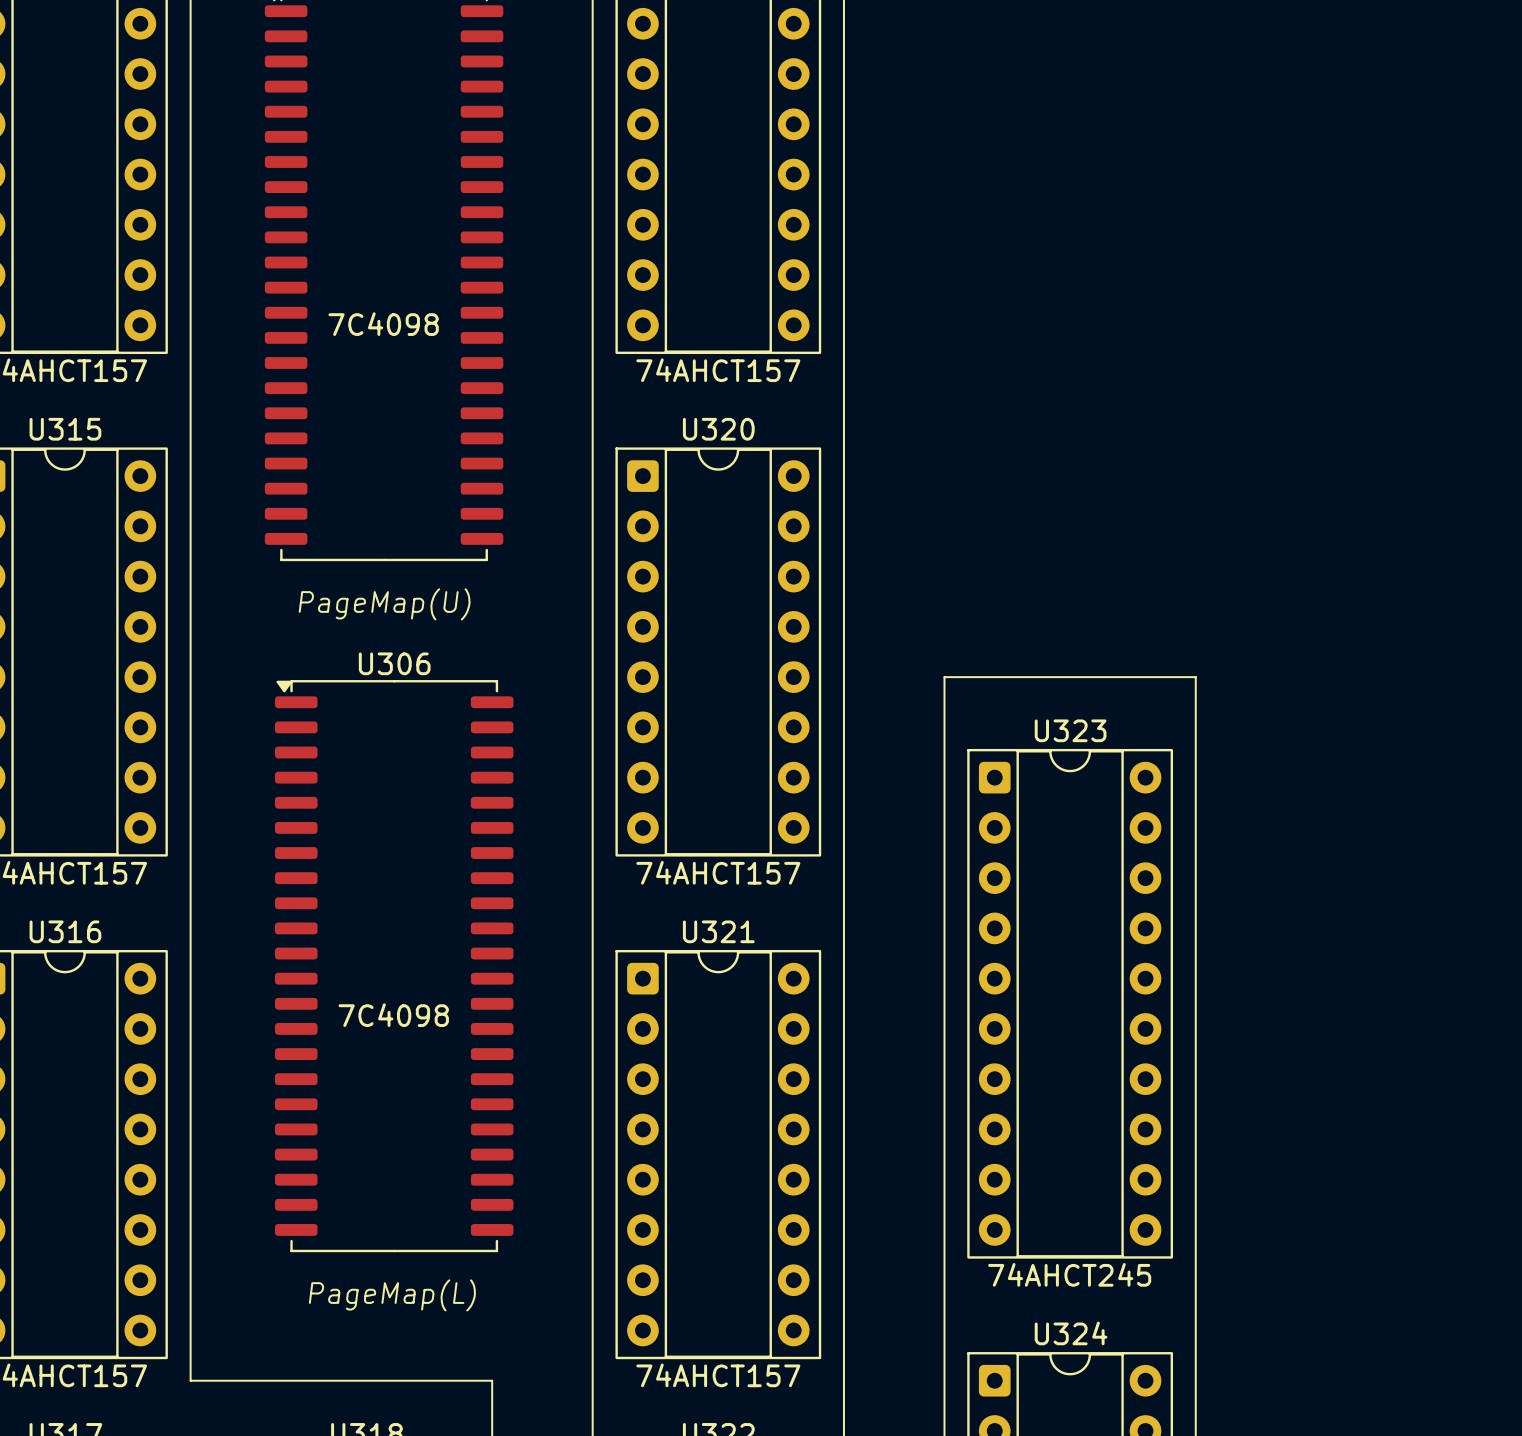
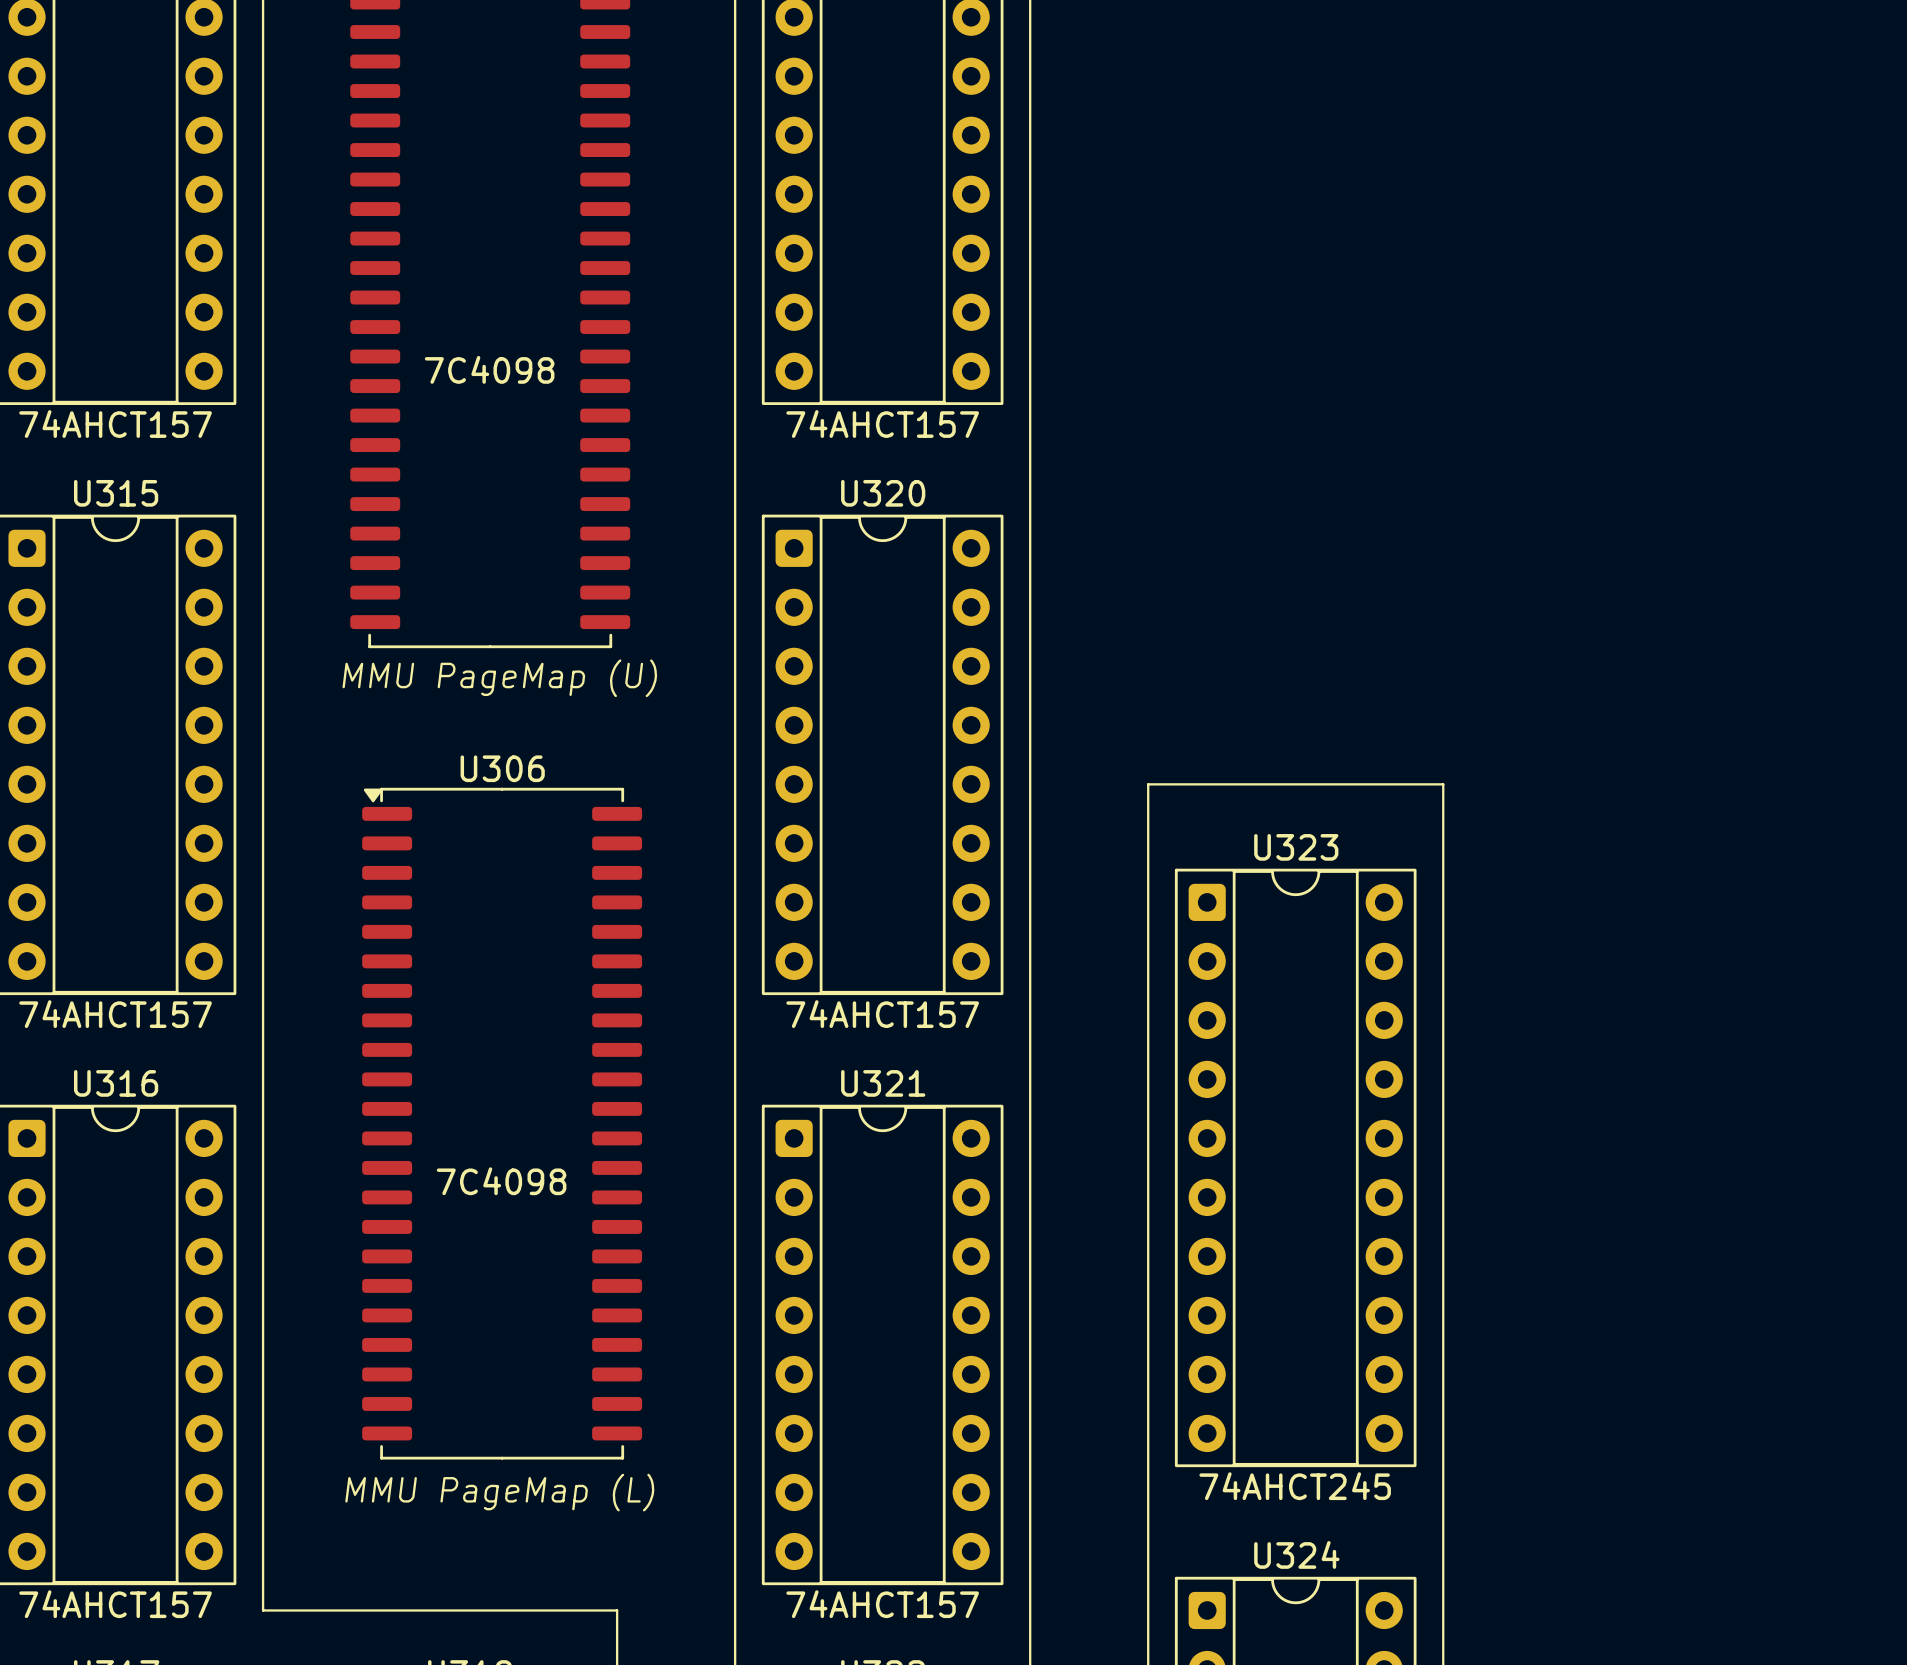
text: PageMap(U) (384, 604) -> MMU PageMap (U) (499, 678)
text: PageMap(L) (392, 1295) -> MMU PageMap (L) (499, 1492)

